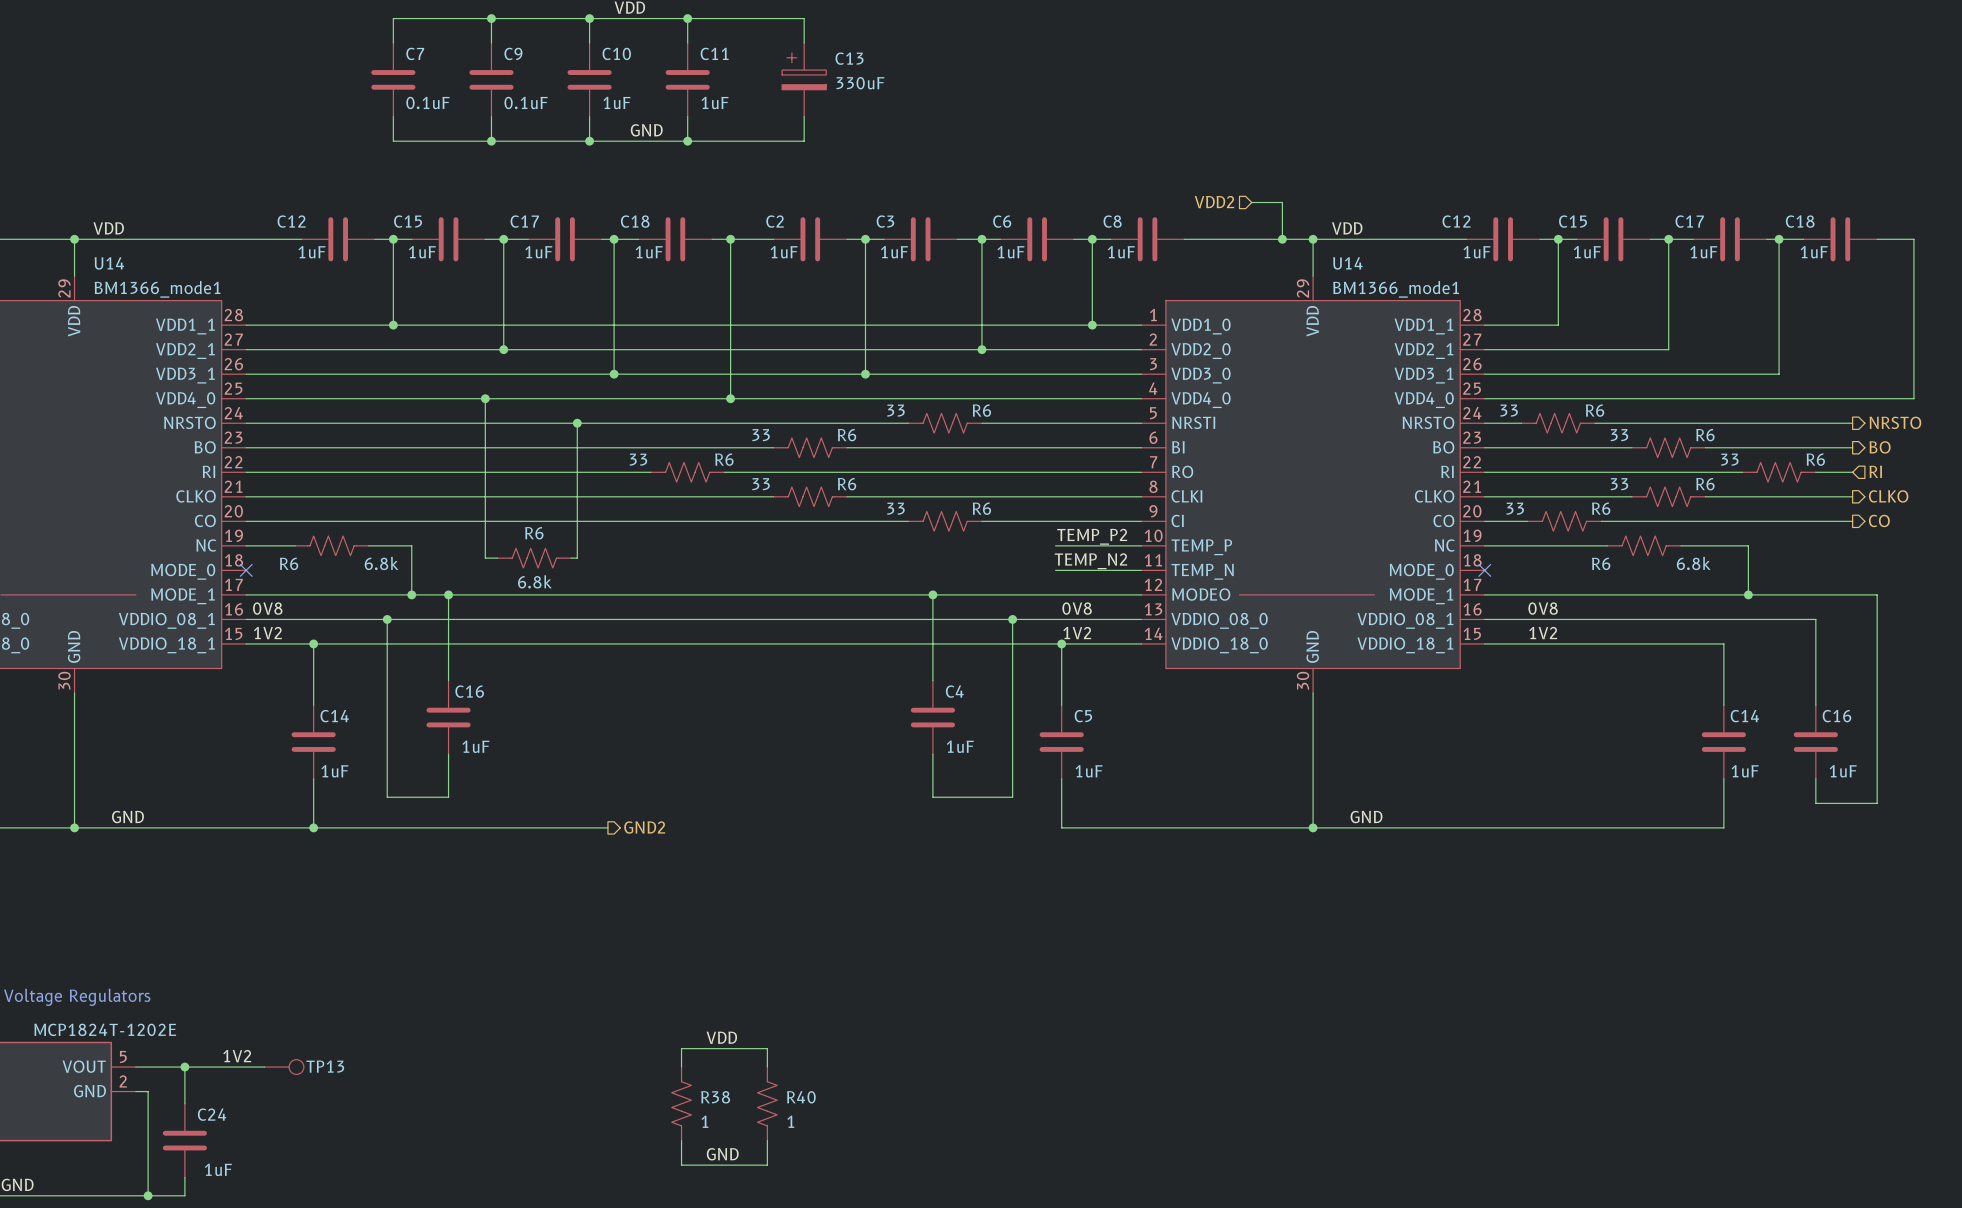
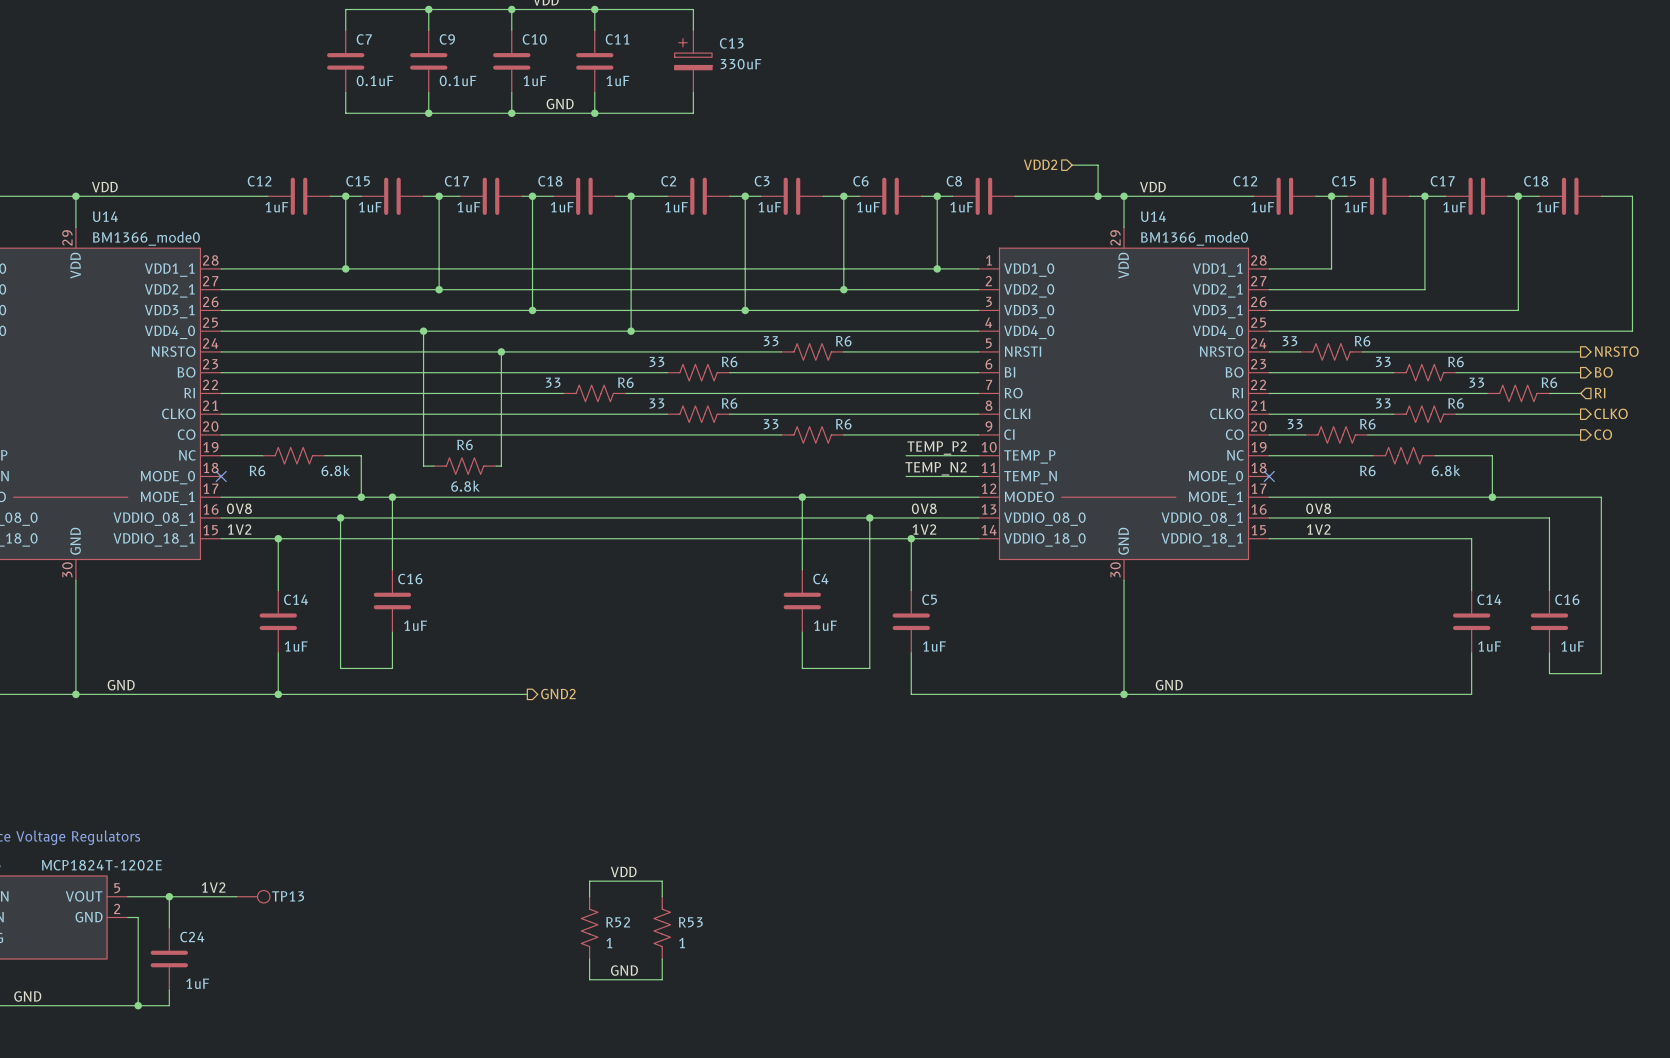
U14 value: BM1366_mode1 (157, 289) -> BM1366_mode0 (146, 238)
U14 value: BM1366_mode1 (1396, 289) -> BM1366_mode0 (1194, 238)
R38 name: R38 (715, 1097) -> R52 (618, 922)
R40 name: R40 (801, 1097) -> R53 (690, 922)

